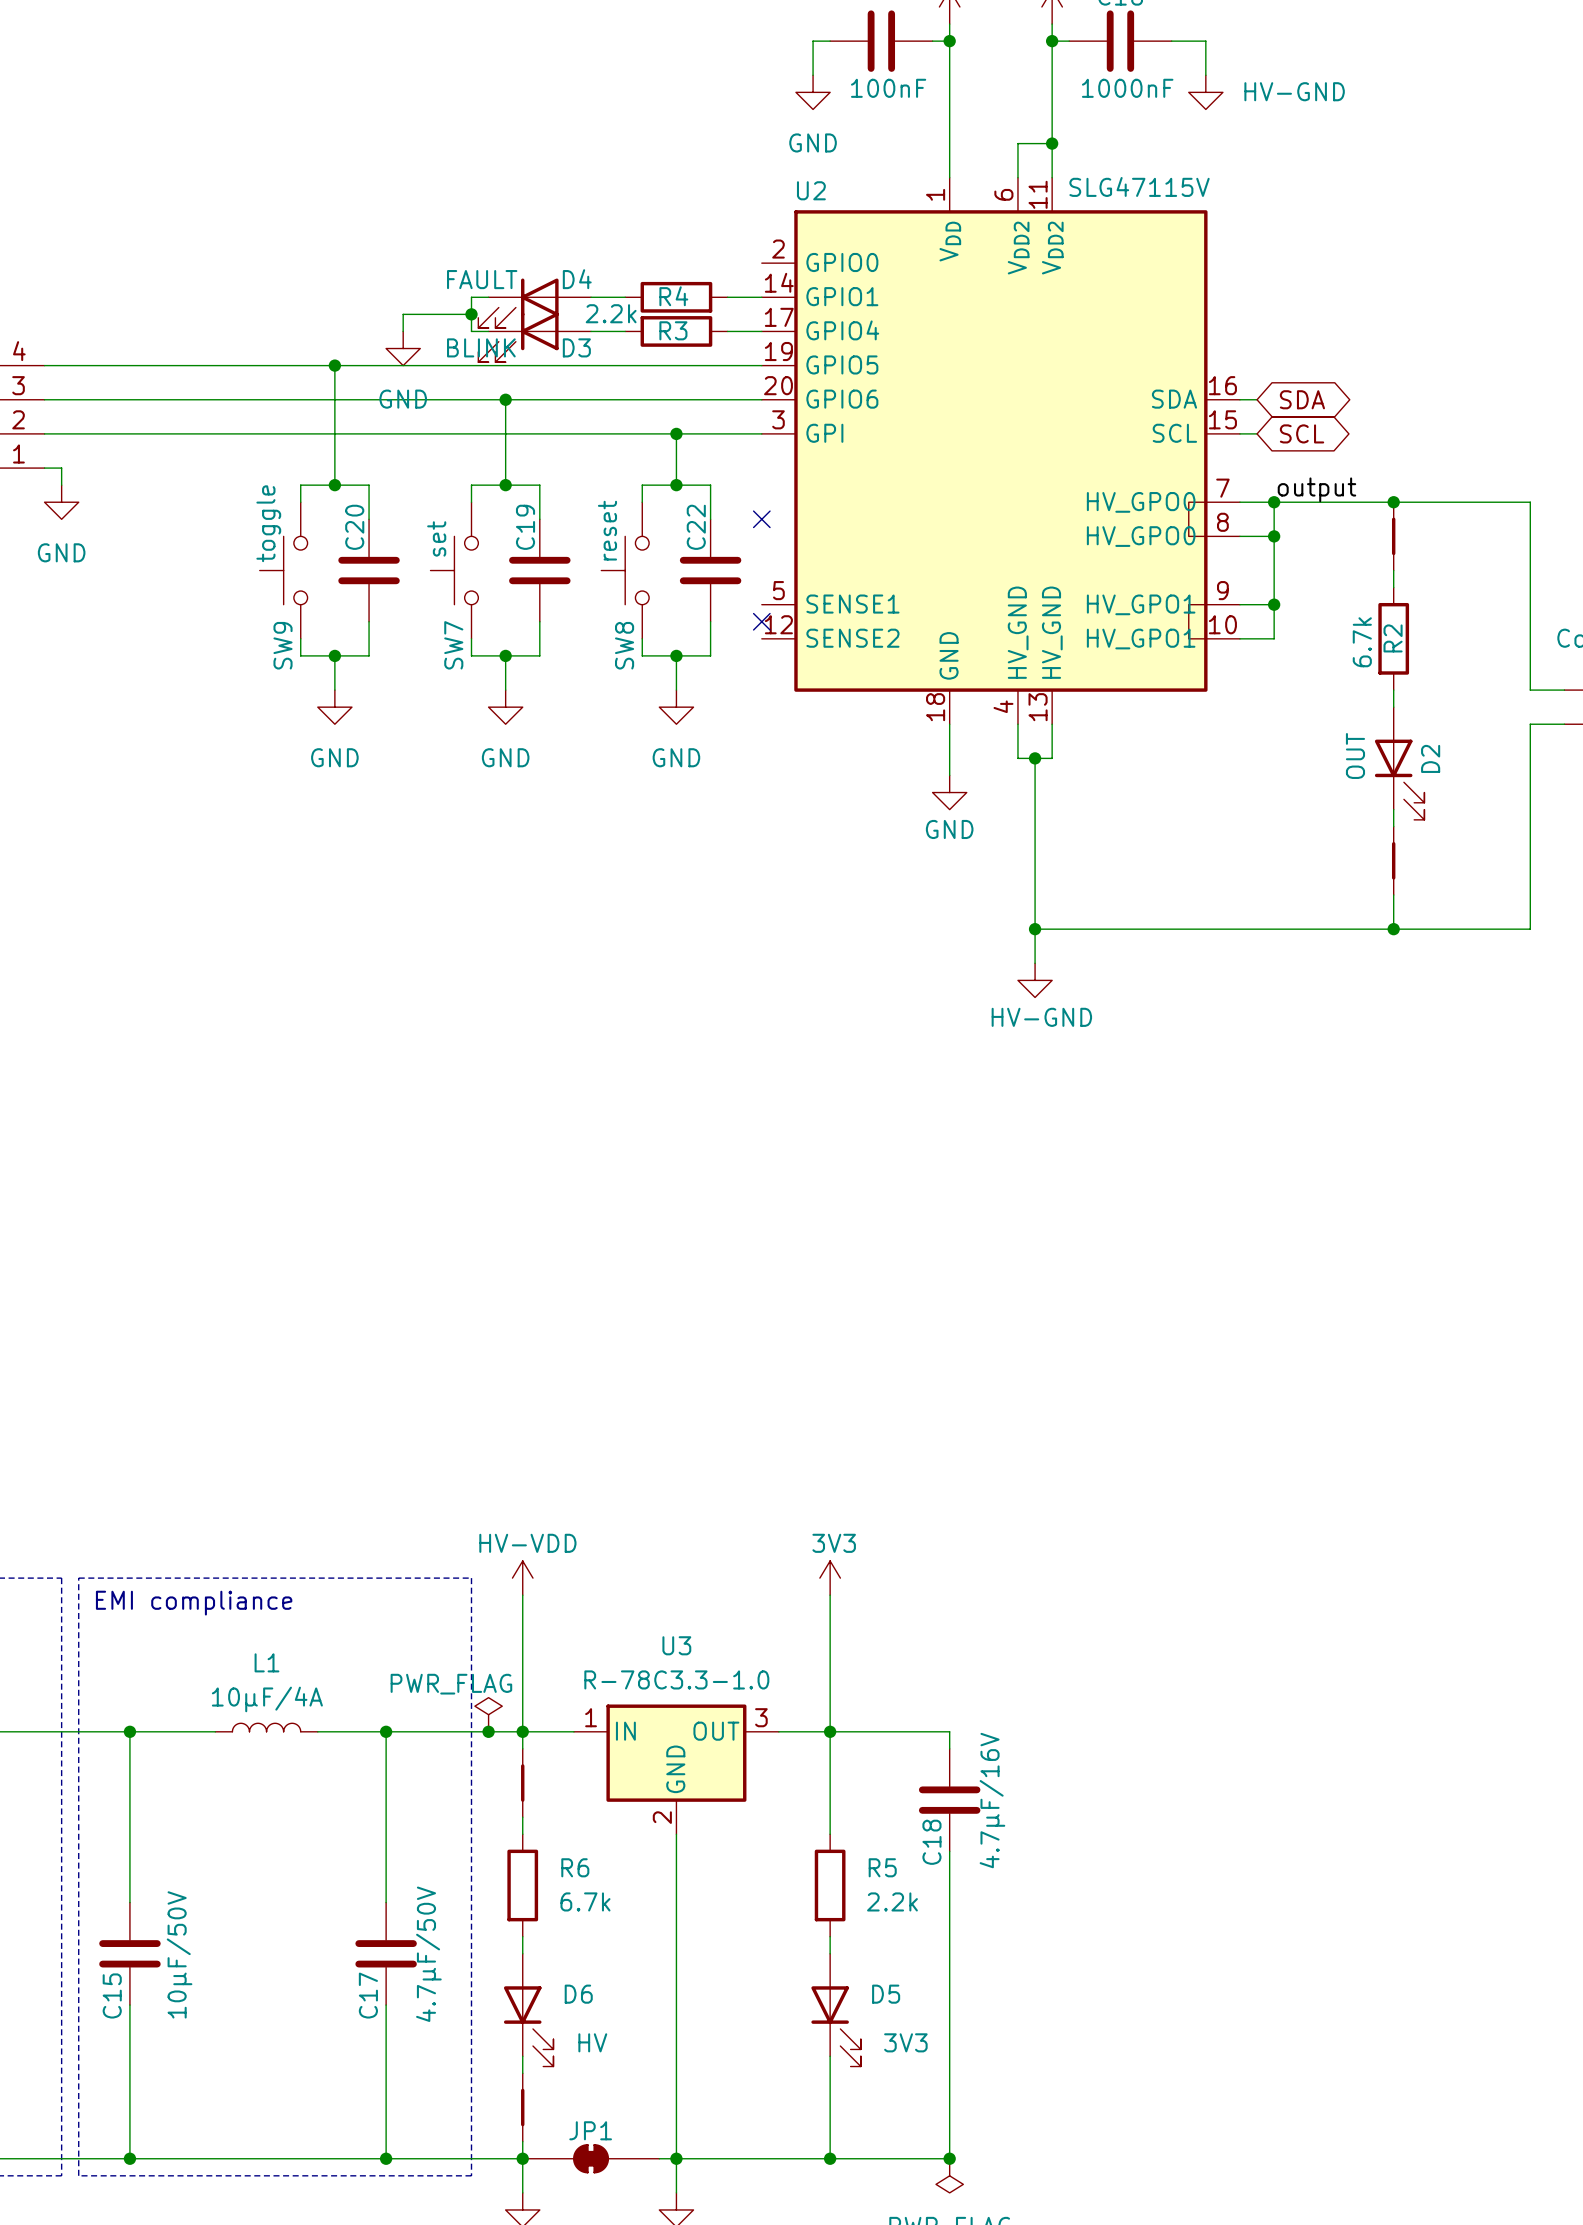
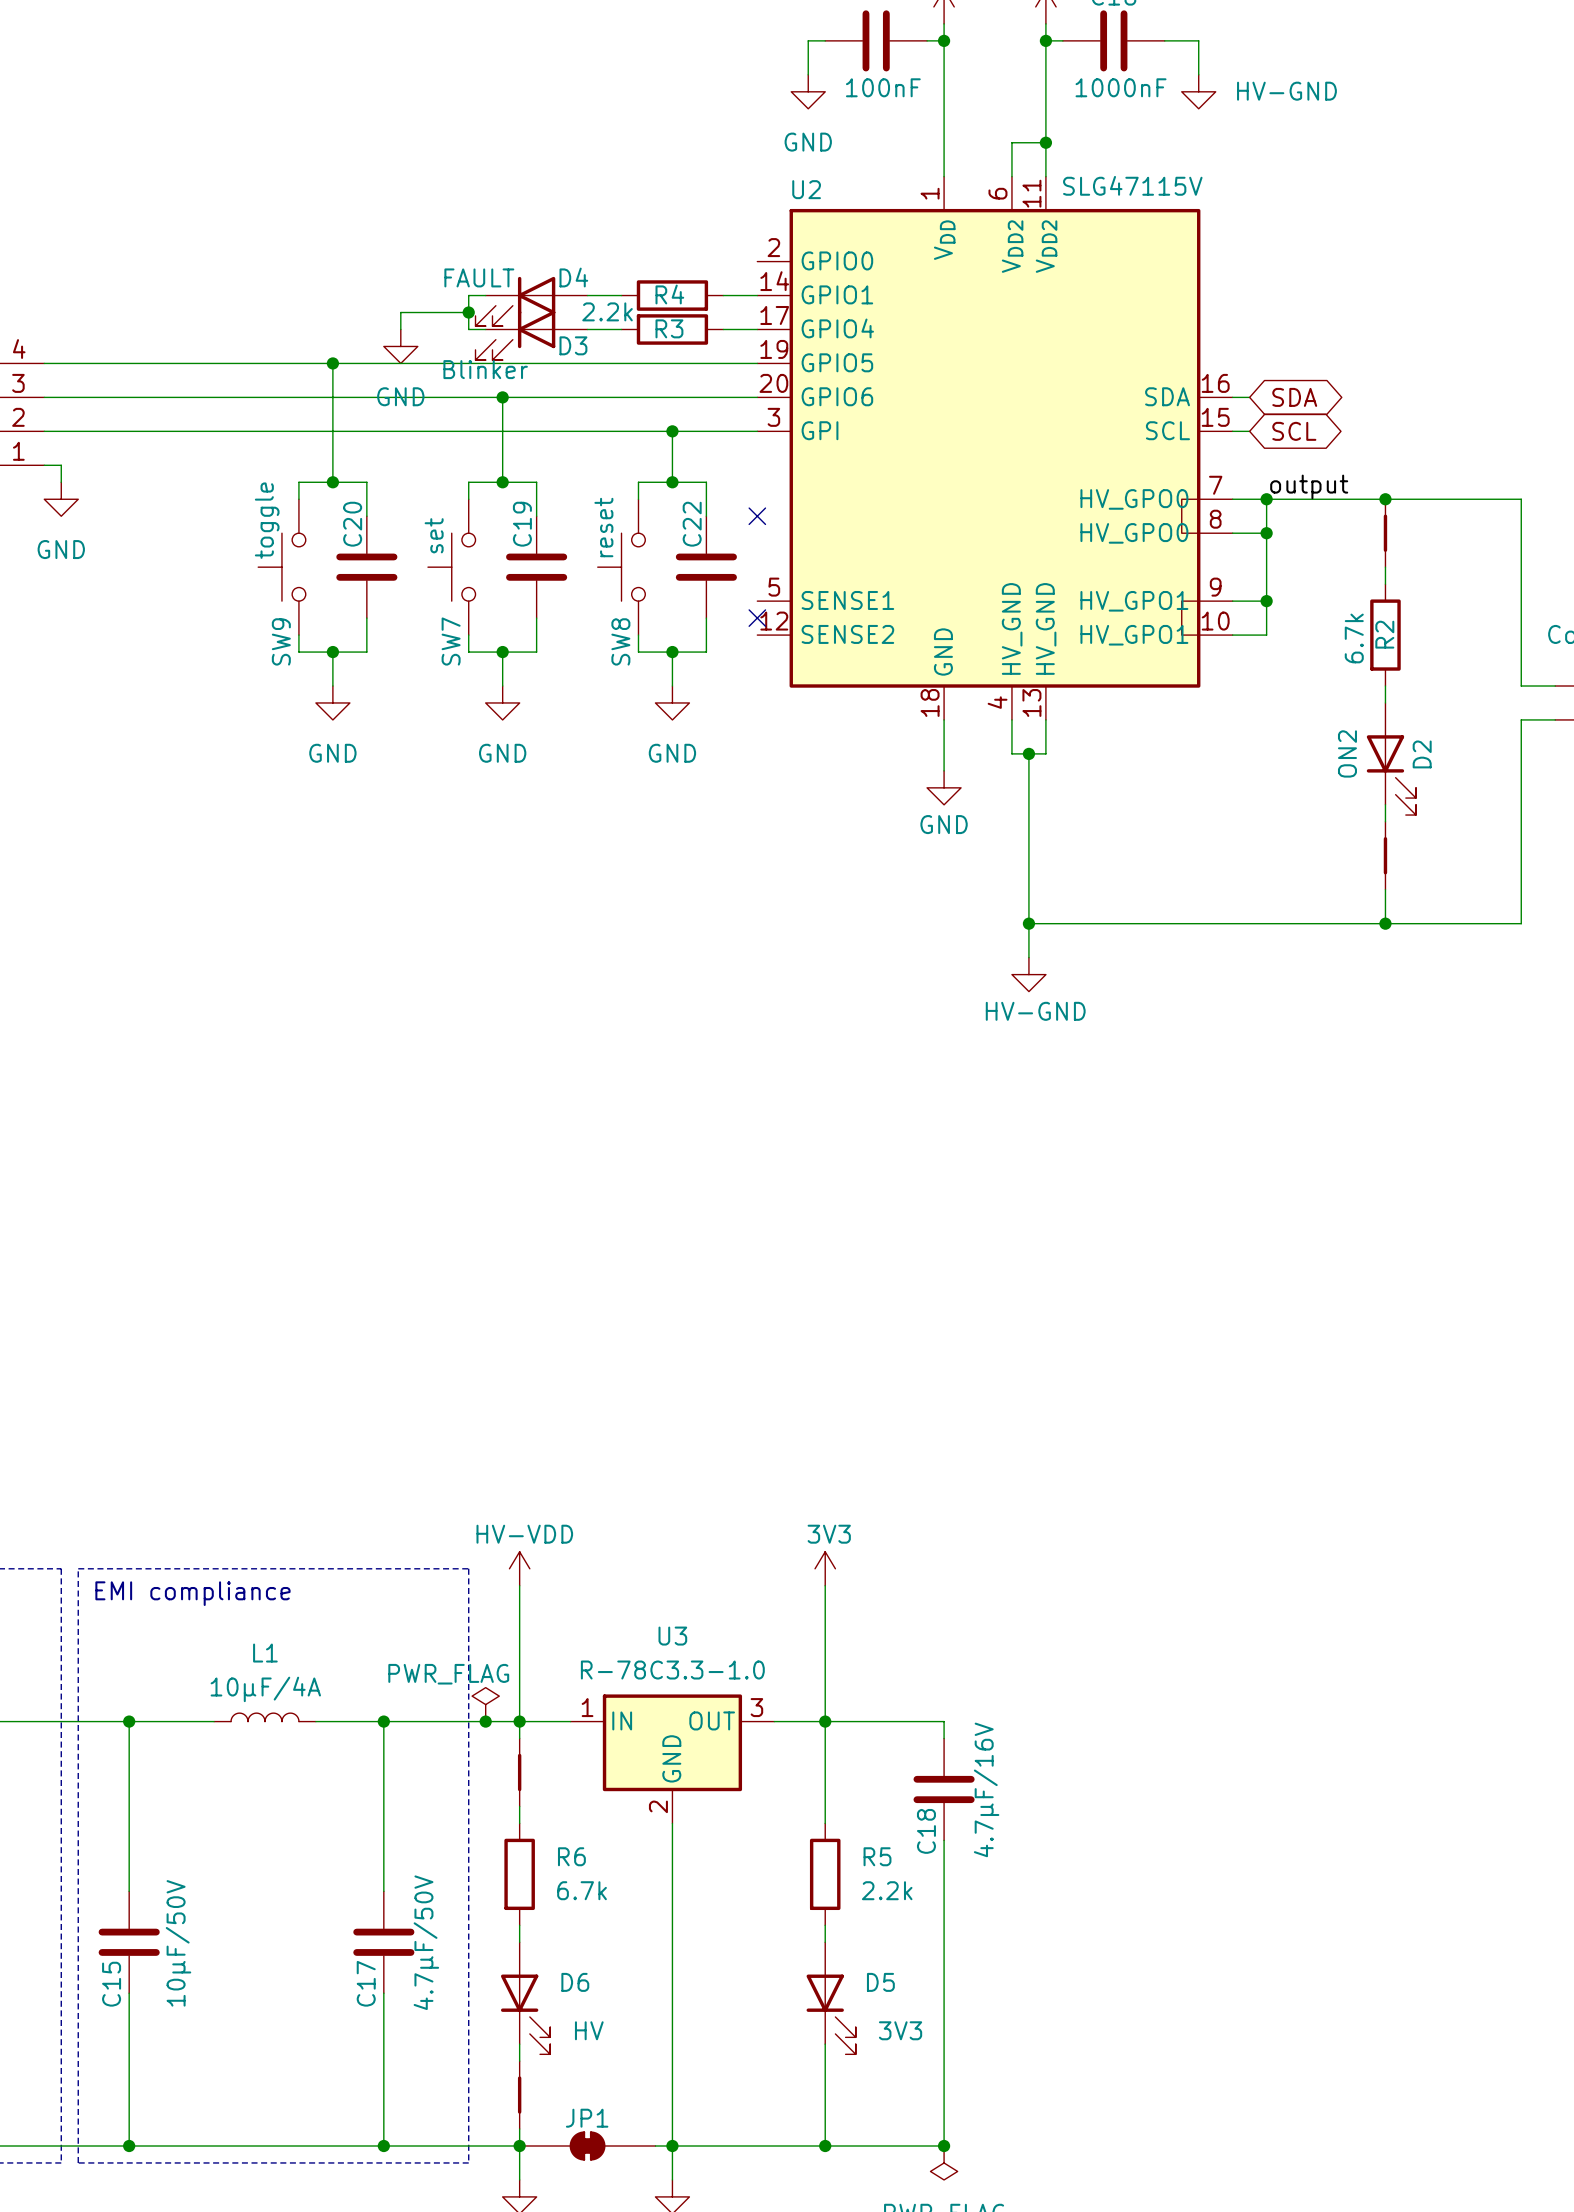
D3 value: BLINK (481, 347) -> Blinker (485, 369)
D2 value: OUT (1355, 755) -> ON2 (1347, 753)

